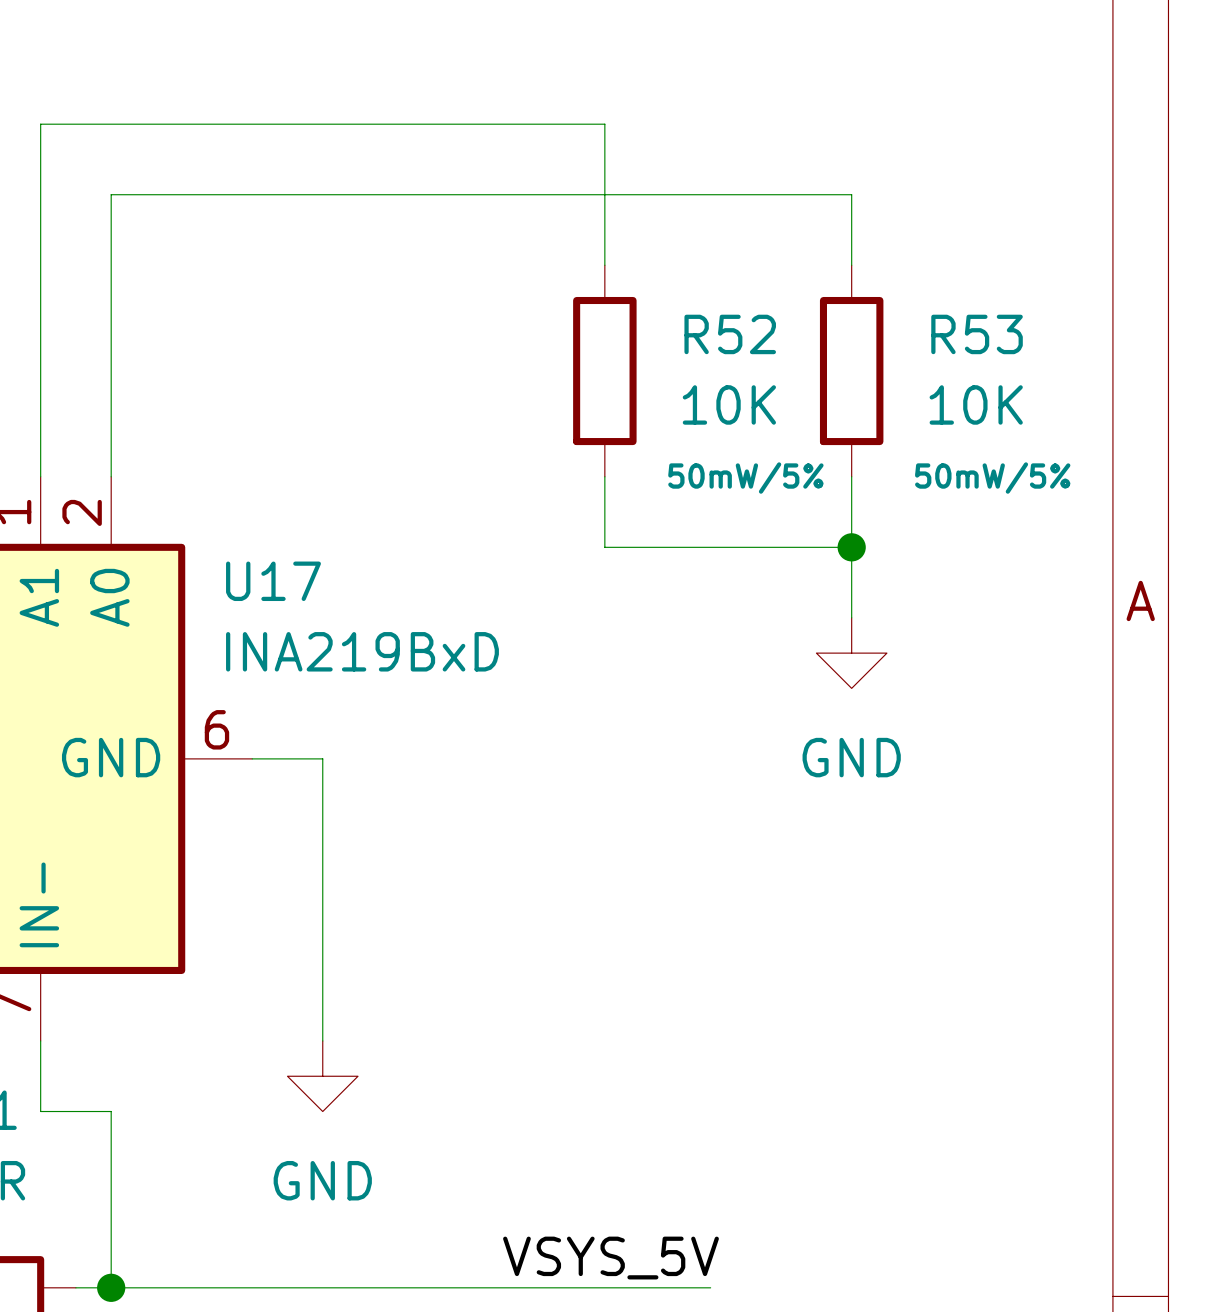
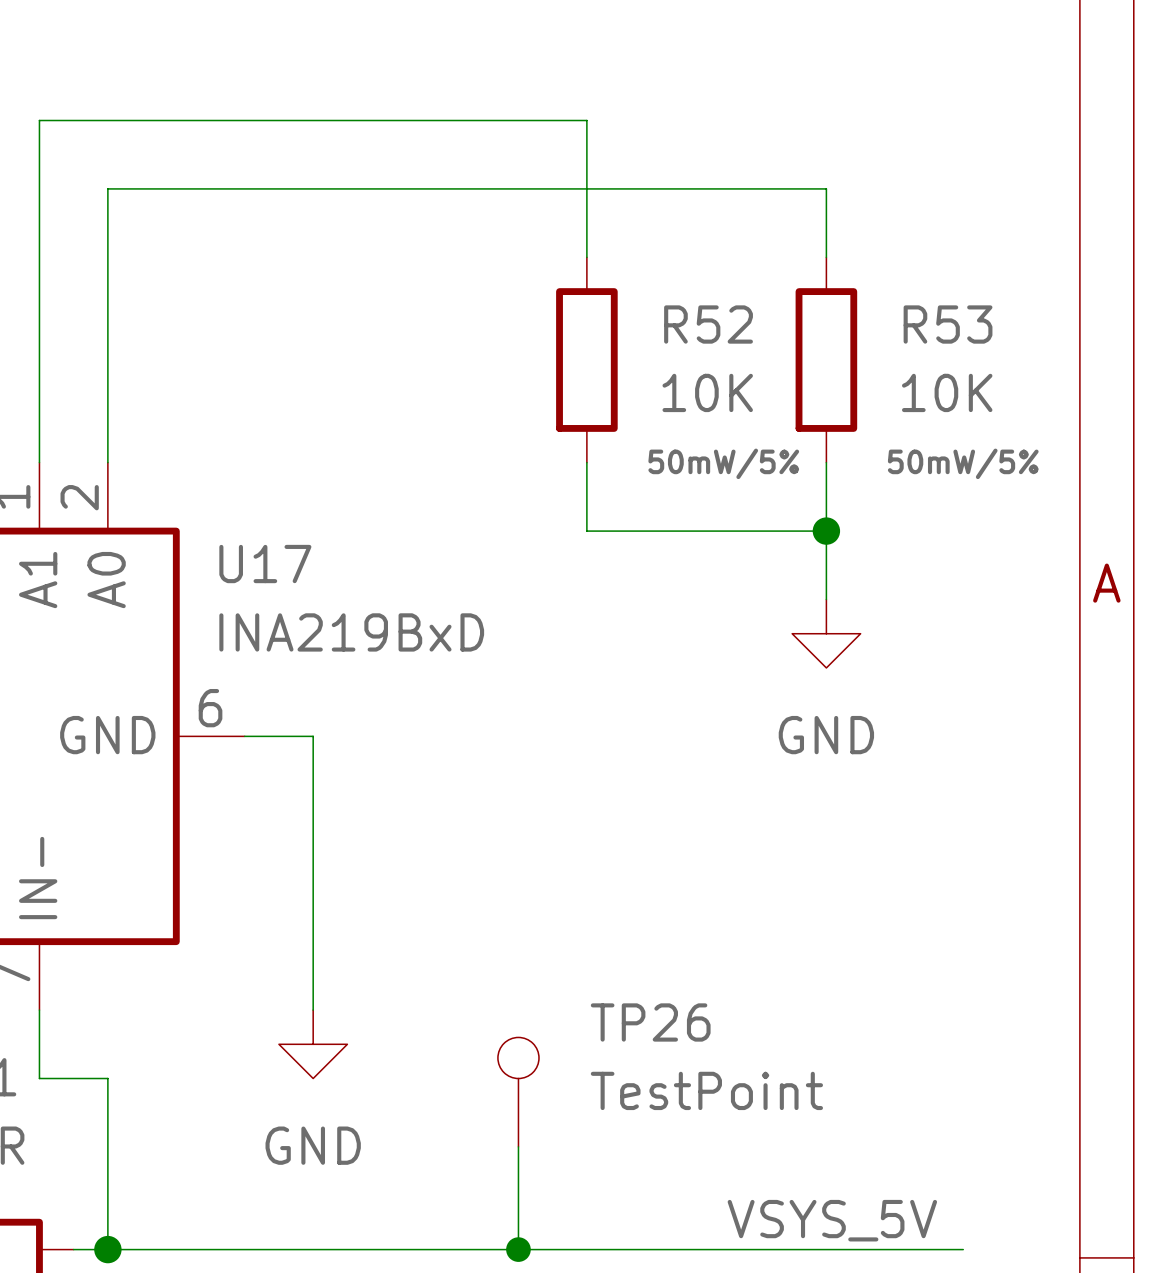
TP26: none -> TestPoint (518, 1092)
wire: none -> (518, 1146) (518, 1249)
label position: VSYS_5V (610, 1258) -> VSYS_5V (832, 1220)
junction: none -> (518, 1249)
wire: none -> (689, 1249) (963, 1249)

